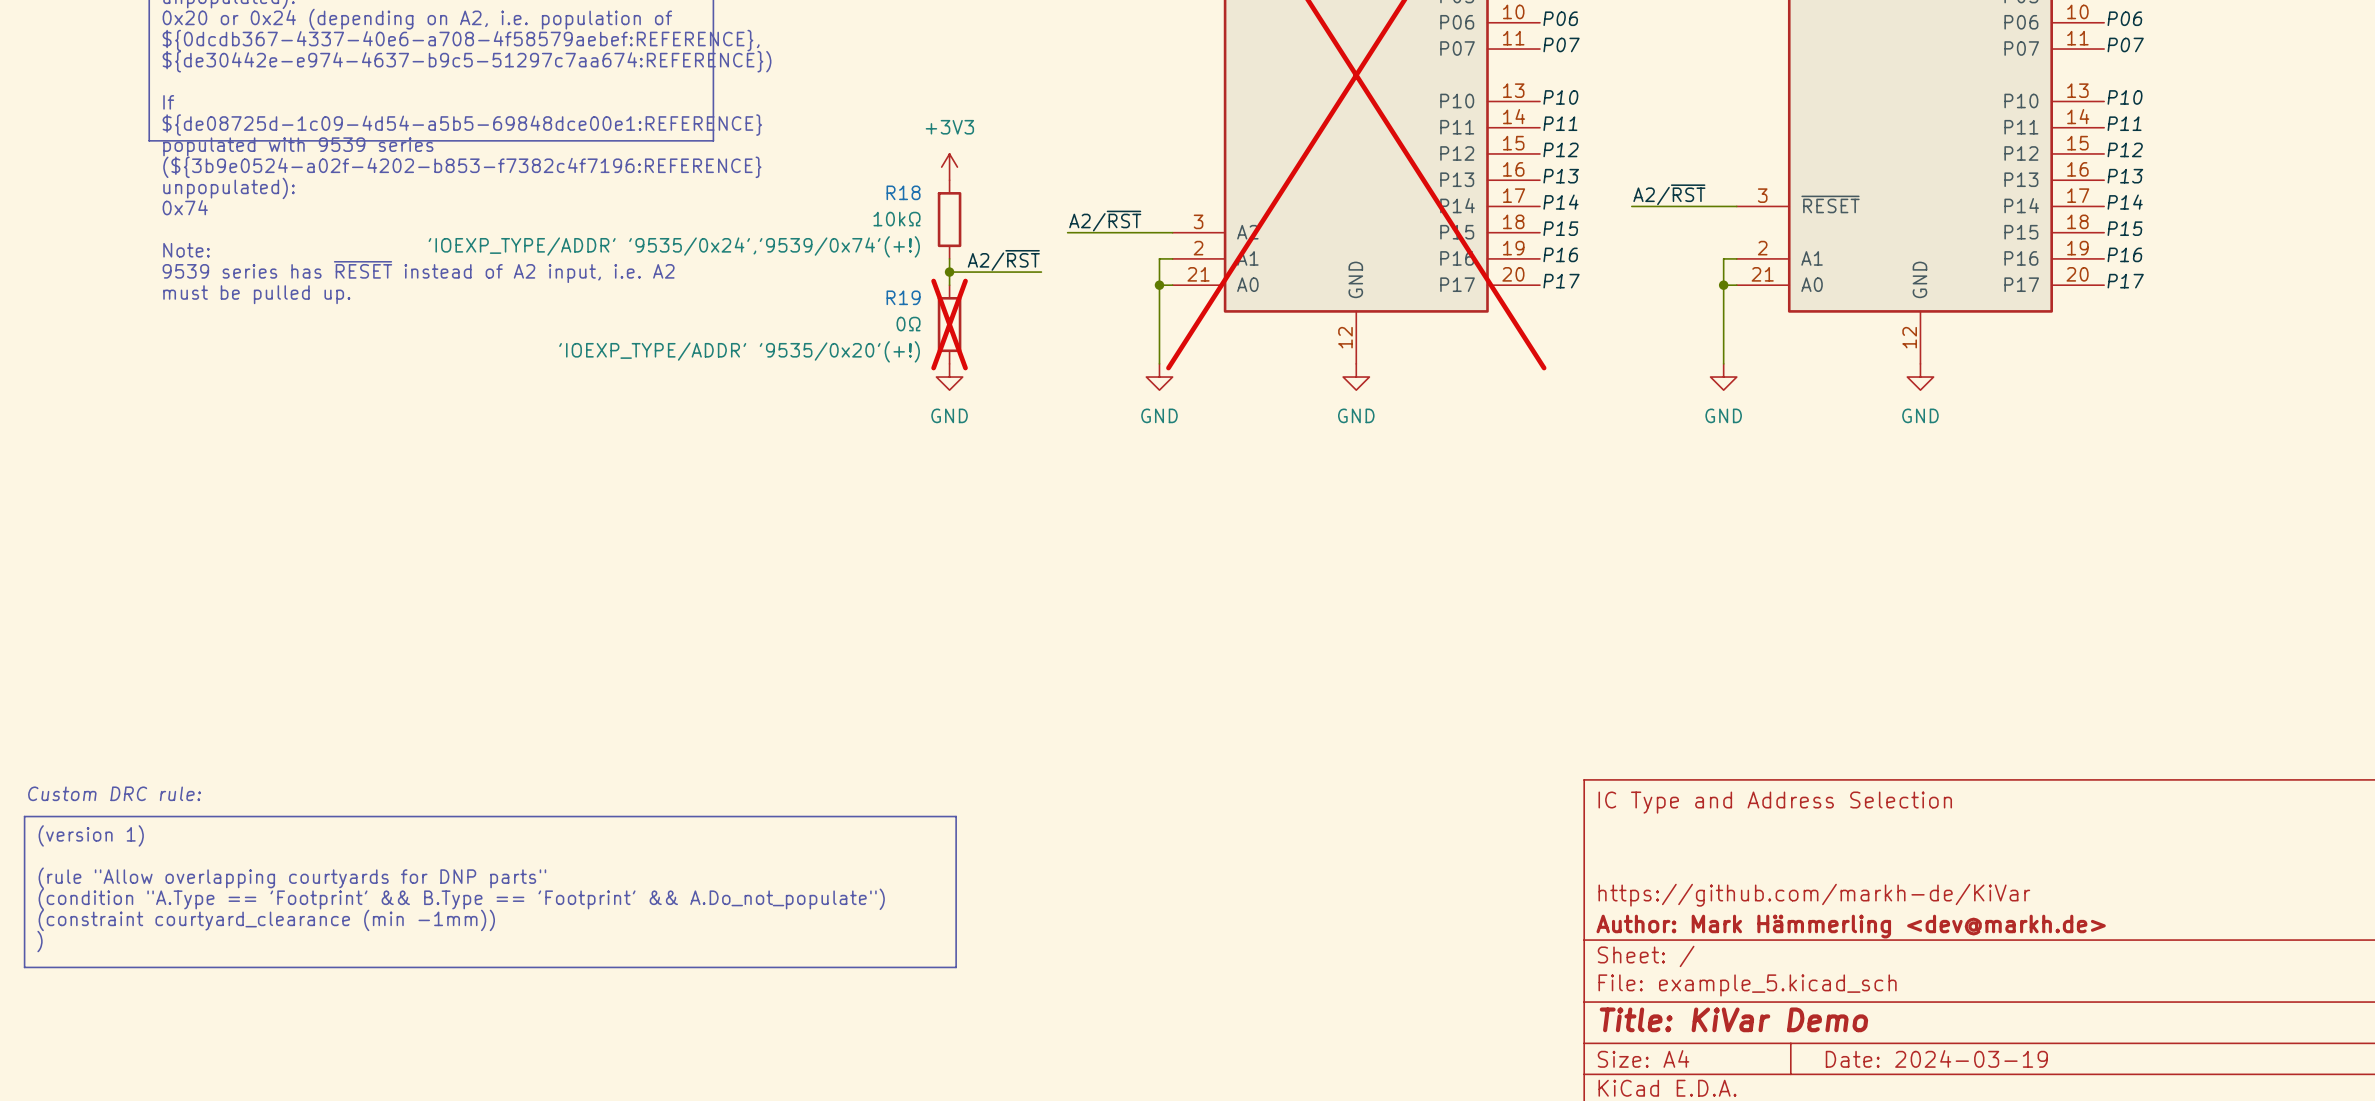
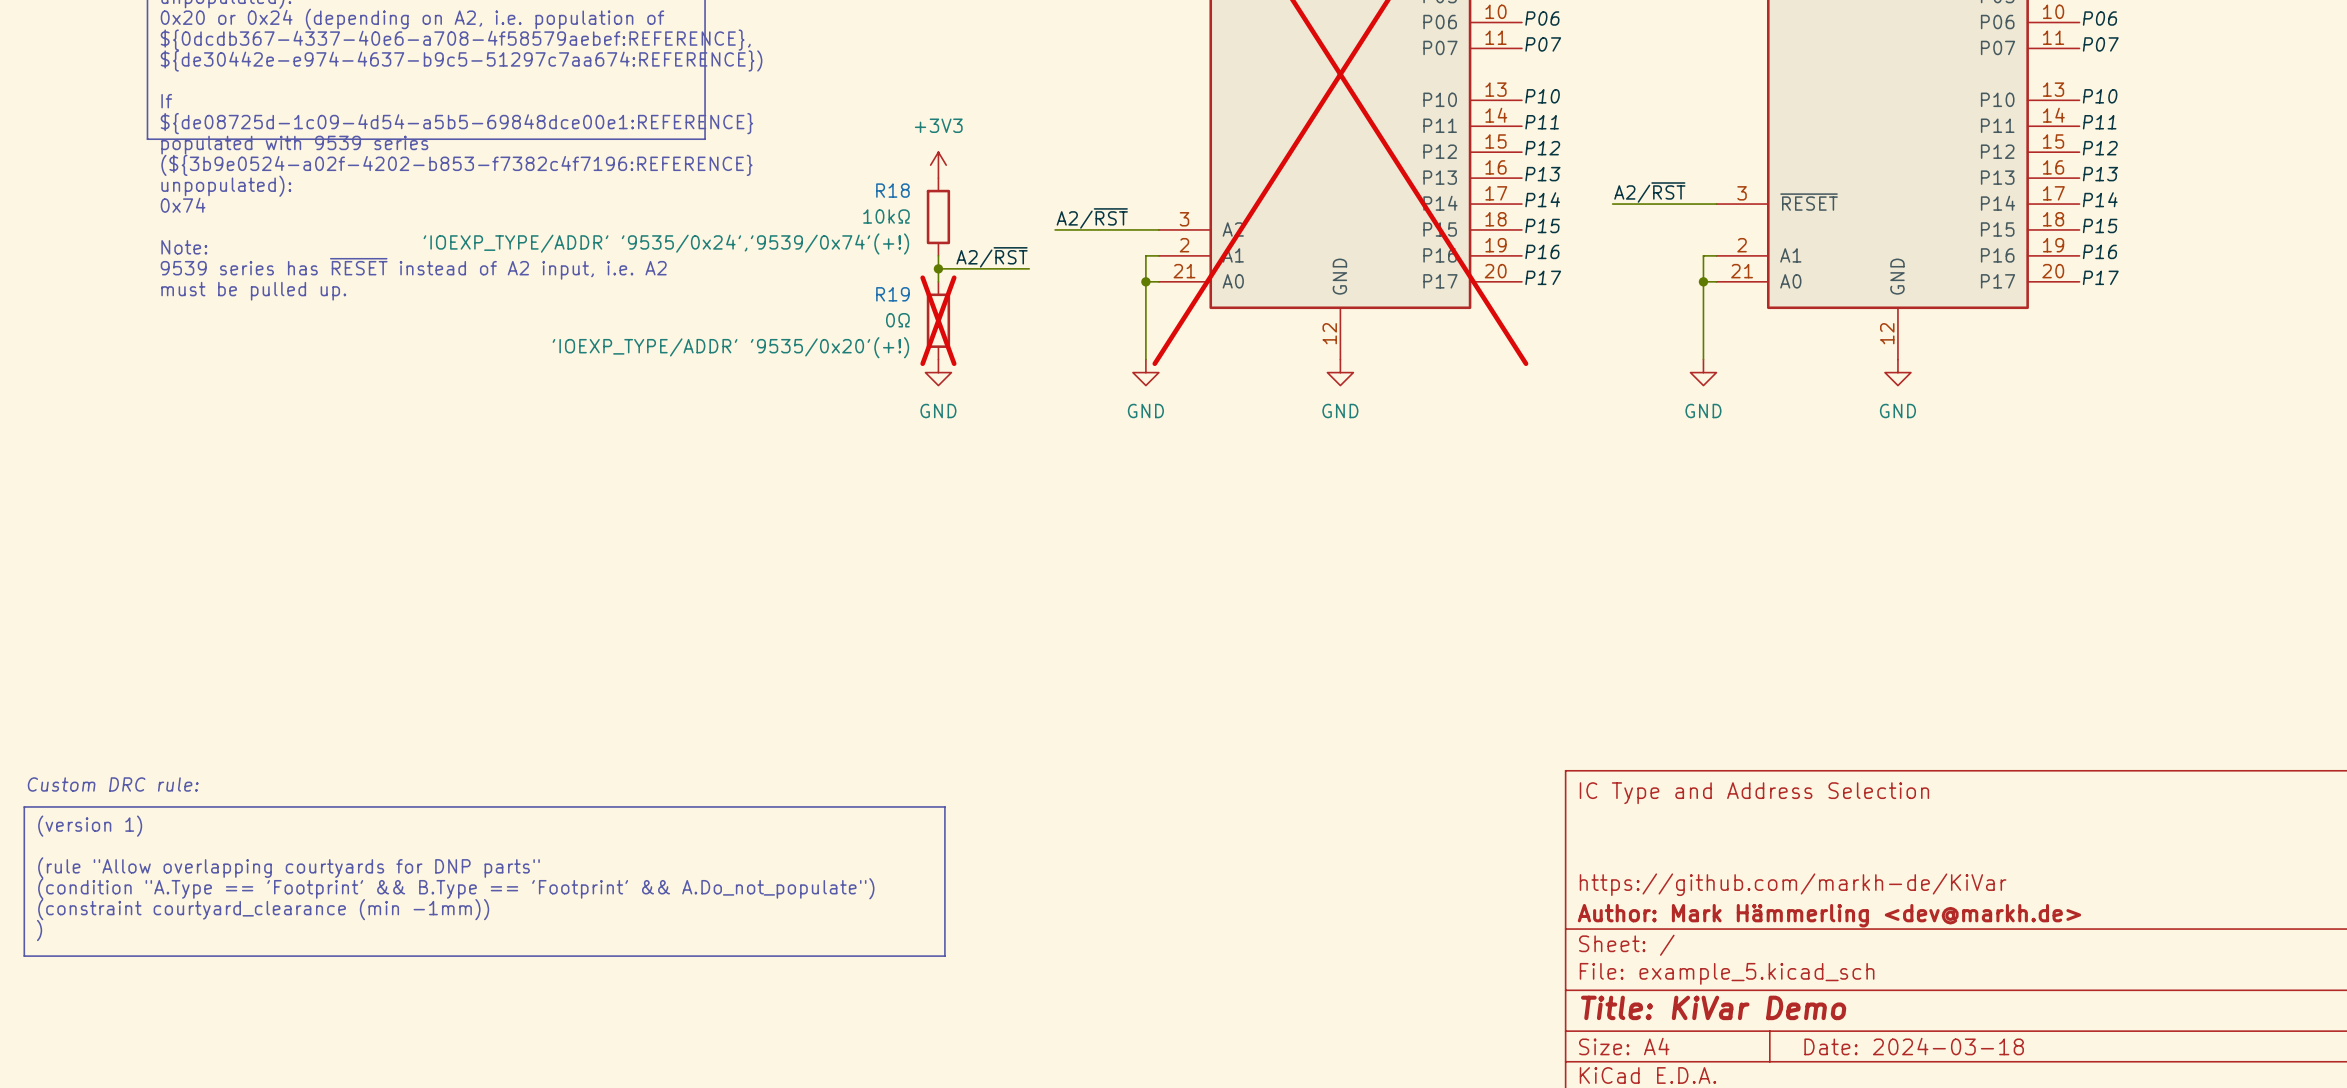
title block: Date: 2024-03-19 (1936, 1058) -> Date: 2024-03-18 (1914, 1046)

